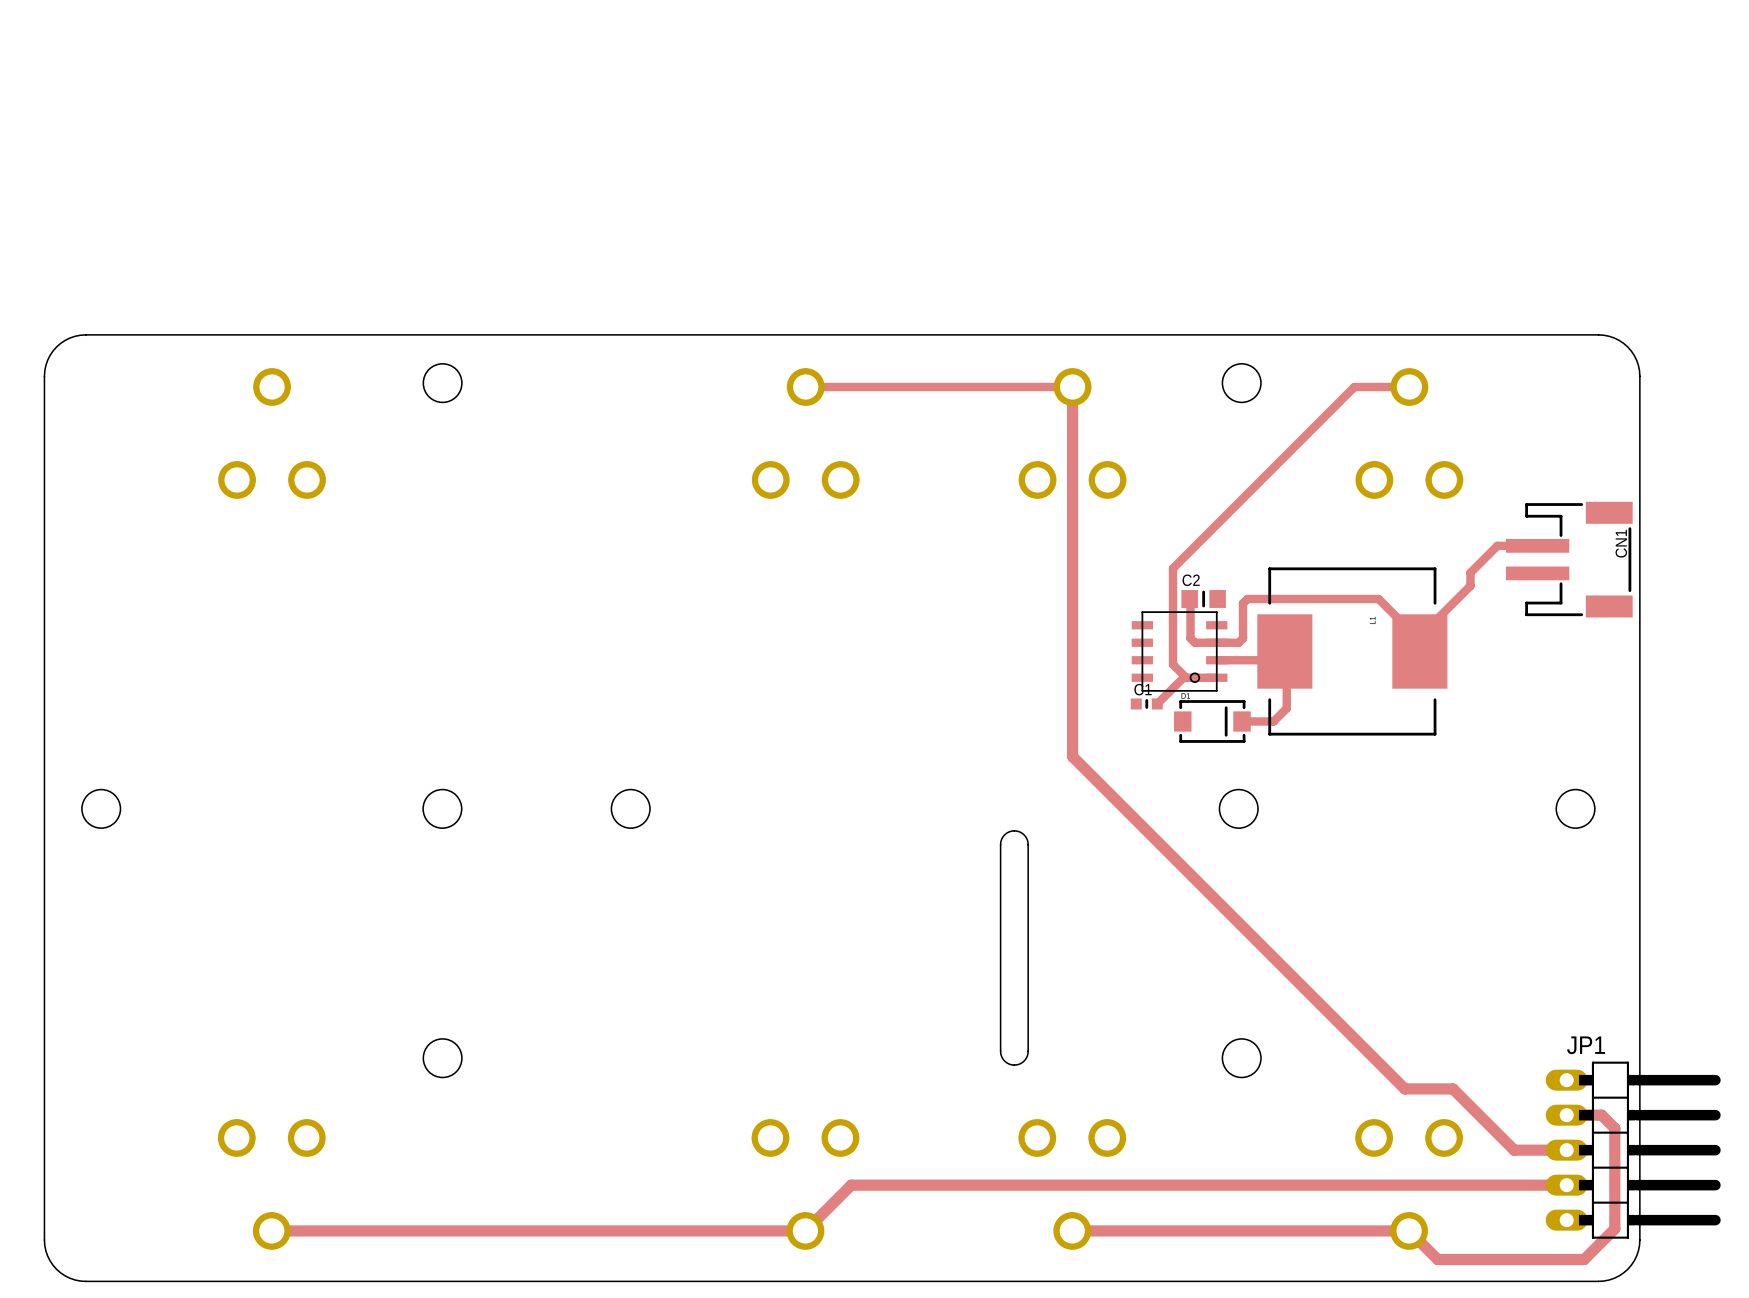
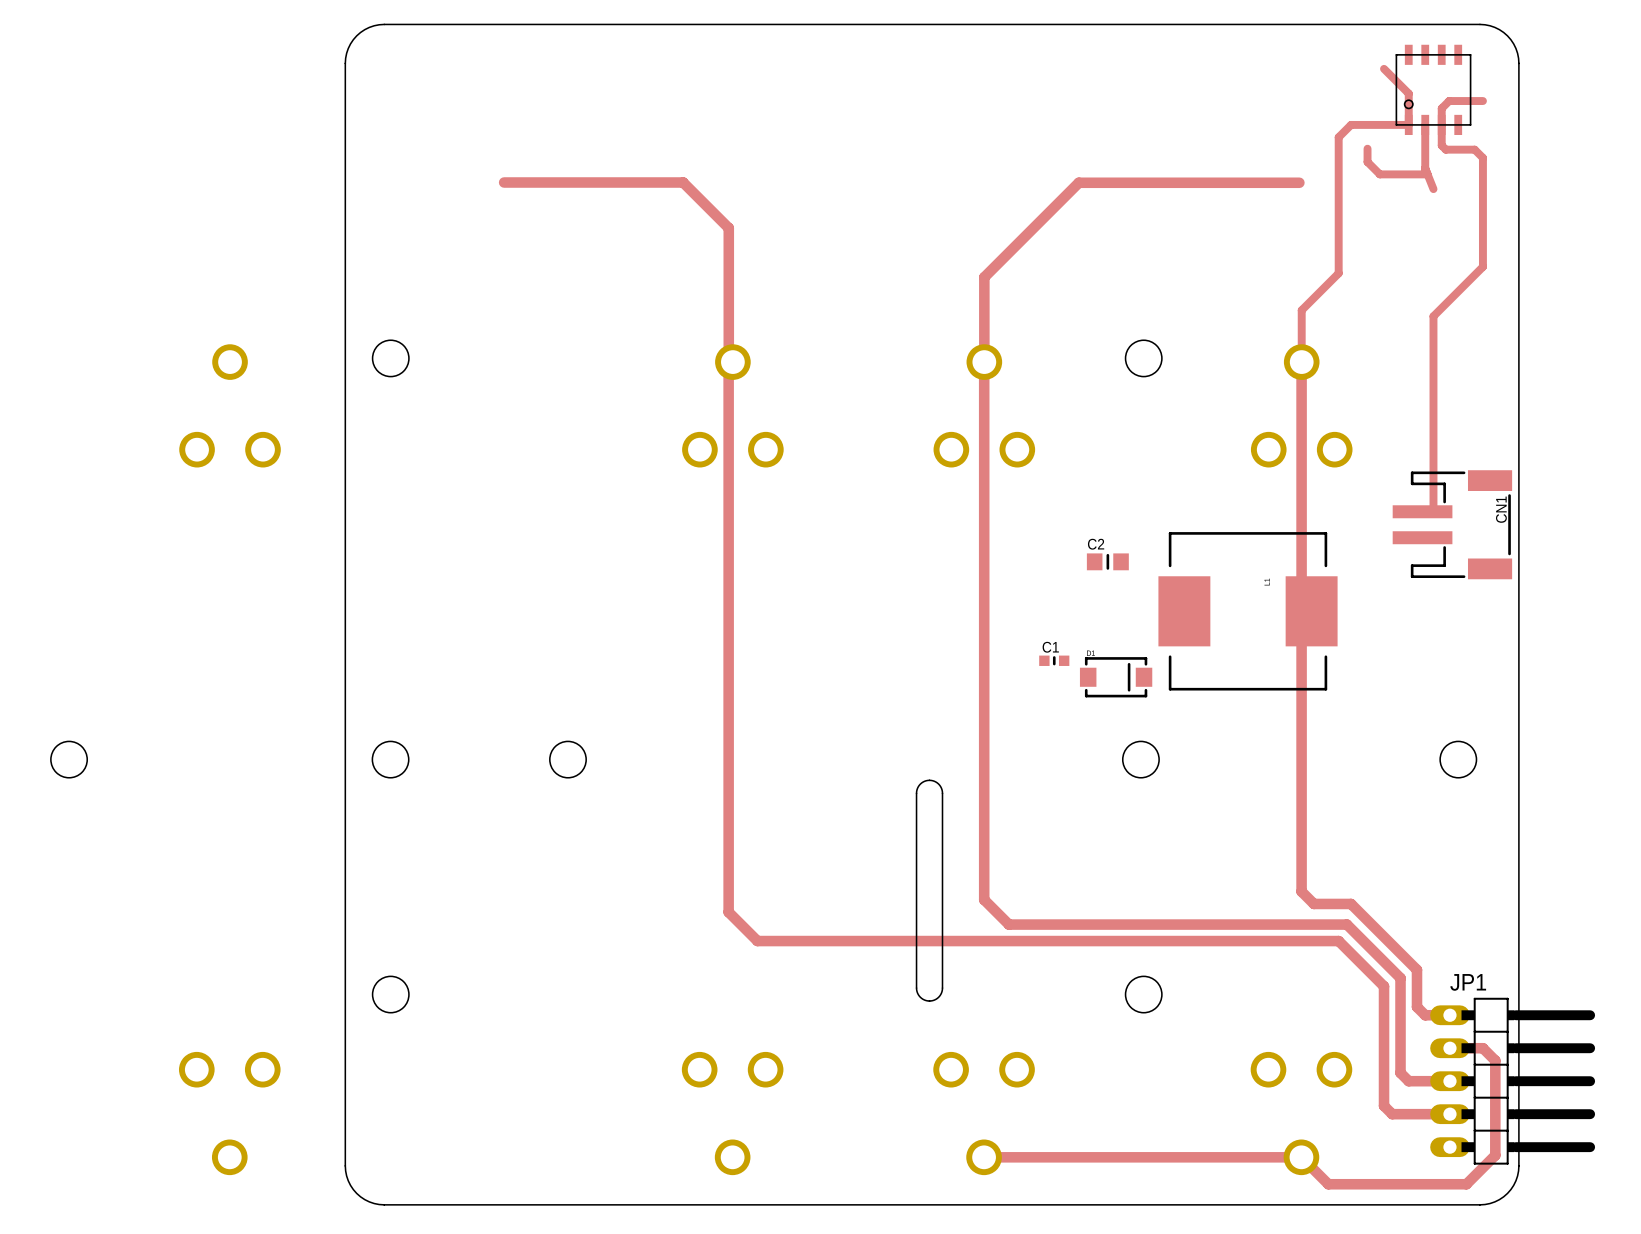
track: none -> (1384, 68) (1408, 93) (1408, 124) (1351, 124) (1338, 137) (1338, 273) (1301, 310) (1301, 362)
part: none -> (1433, 89)
track: none -> (1482, 101) (1449, 101) (1441, 108) (1441, 145) (1445, 149) (1474, 149) (1482, 157) (1482, 266) (1433, 316) (1433, 512)
track: none -> (1425, 124) (1425, 168)
track: none -> (1367, 148) (1367, 162) (1379, 174) (1427, 174) (1425, 168)
track: none -> (1425, 168) (1433, 189)
track: none -> (504, 182) (683, 182) (728, 228) (728, 362)
track: none -> (1299, 182) (1078, 182) (984, 277) (984, 362)
board edge: (1639, 376) (1636, 360) (1627, 346) (1614, 338) (1598, 334) (85, 334) (75, 336) (60, 343) (49, 355) (44, 376) (44, 1240) (47, 1255) (60, 1272) (80, 1281) (435, 1281) -> (1518, 351) (1518, 58) (1510, 39) (1503, 32) (1490, 25) (384, 24) (374, 25) (360, 32) (350, 43) (345, 63) (345, 1165) (348, 1180) (356, 1193) (369, 1201) (384, 1204)
track: (805, 386) (1072, 386) (1072, 756) (1404, 1088) (1452, 1088) (1514, 1150) (1522, 1150) -> (984, 362) (984, 899) (1008, 924) (1346, 924) (1400, 978) (1400, 1072) (1408, 1081)
track: (1409, 386) (1354, 386) (1173, 568) (1173, 664) (1186, 677) -> (1301, 362) (1301, 891) (1313, 903) (1351, 903) (1417, 969) (1417, 1007) (1425, 1015) (1449, 1015)
track: (1537, 545) (1497, 545) (1470, 572) (1470, 585) (1417, 638) -> none
track: (1189, 599) (1190, 638) (1194, 642) (1238, 642) (1243, 638) (1243, 603) (1247, 599) (1378, 599) (1417, 638) -> none
part: (1179, 651) -> none
track: (1216, 660) (1286, 660) (1286, 708) (1273, 721) (1242, 721) -> none
track: (1216, 677) (1183, 677) (1157, 703) -> none
track: (1505, 1185) (851, 1185) (805, 1230) (271, 1230) -> (1392, 1114) (1384, 1105) (1384, 986) (1338, 941) (757, 941) (728, 912) (728, 362)

